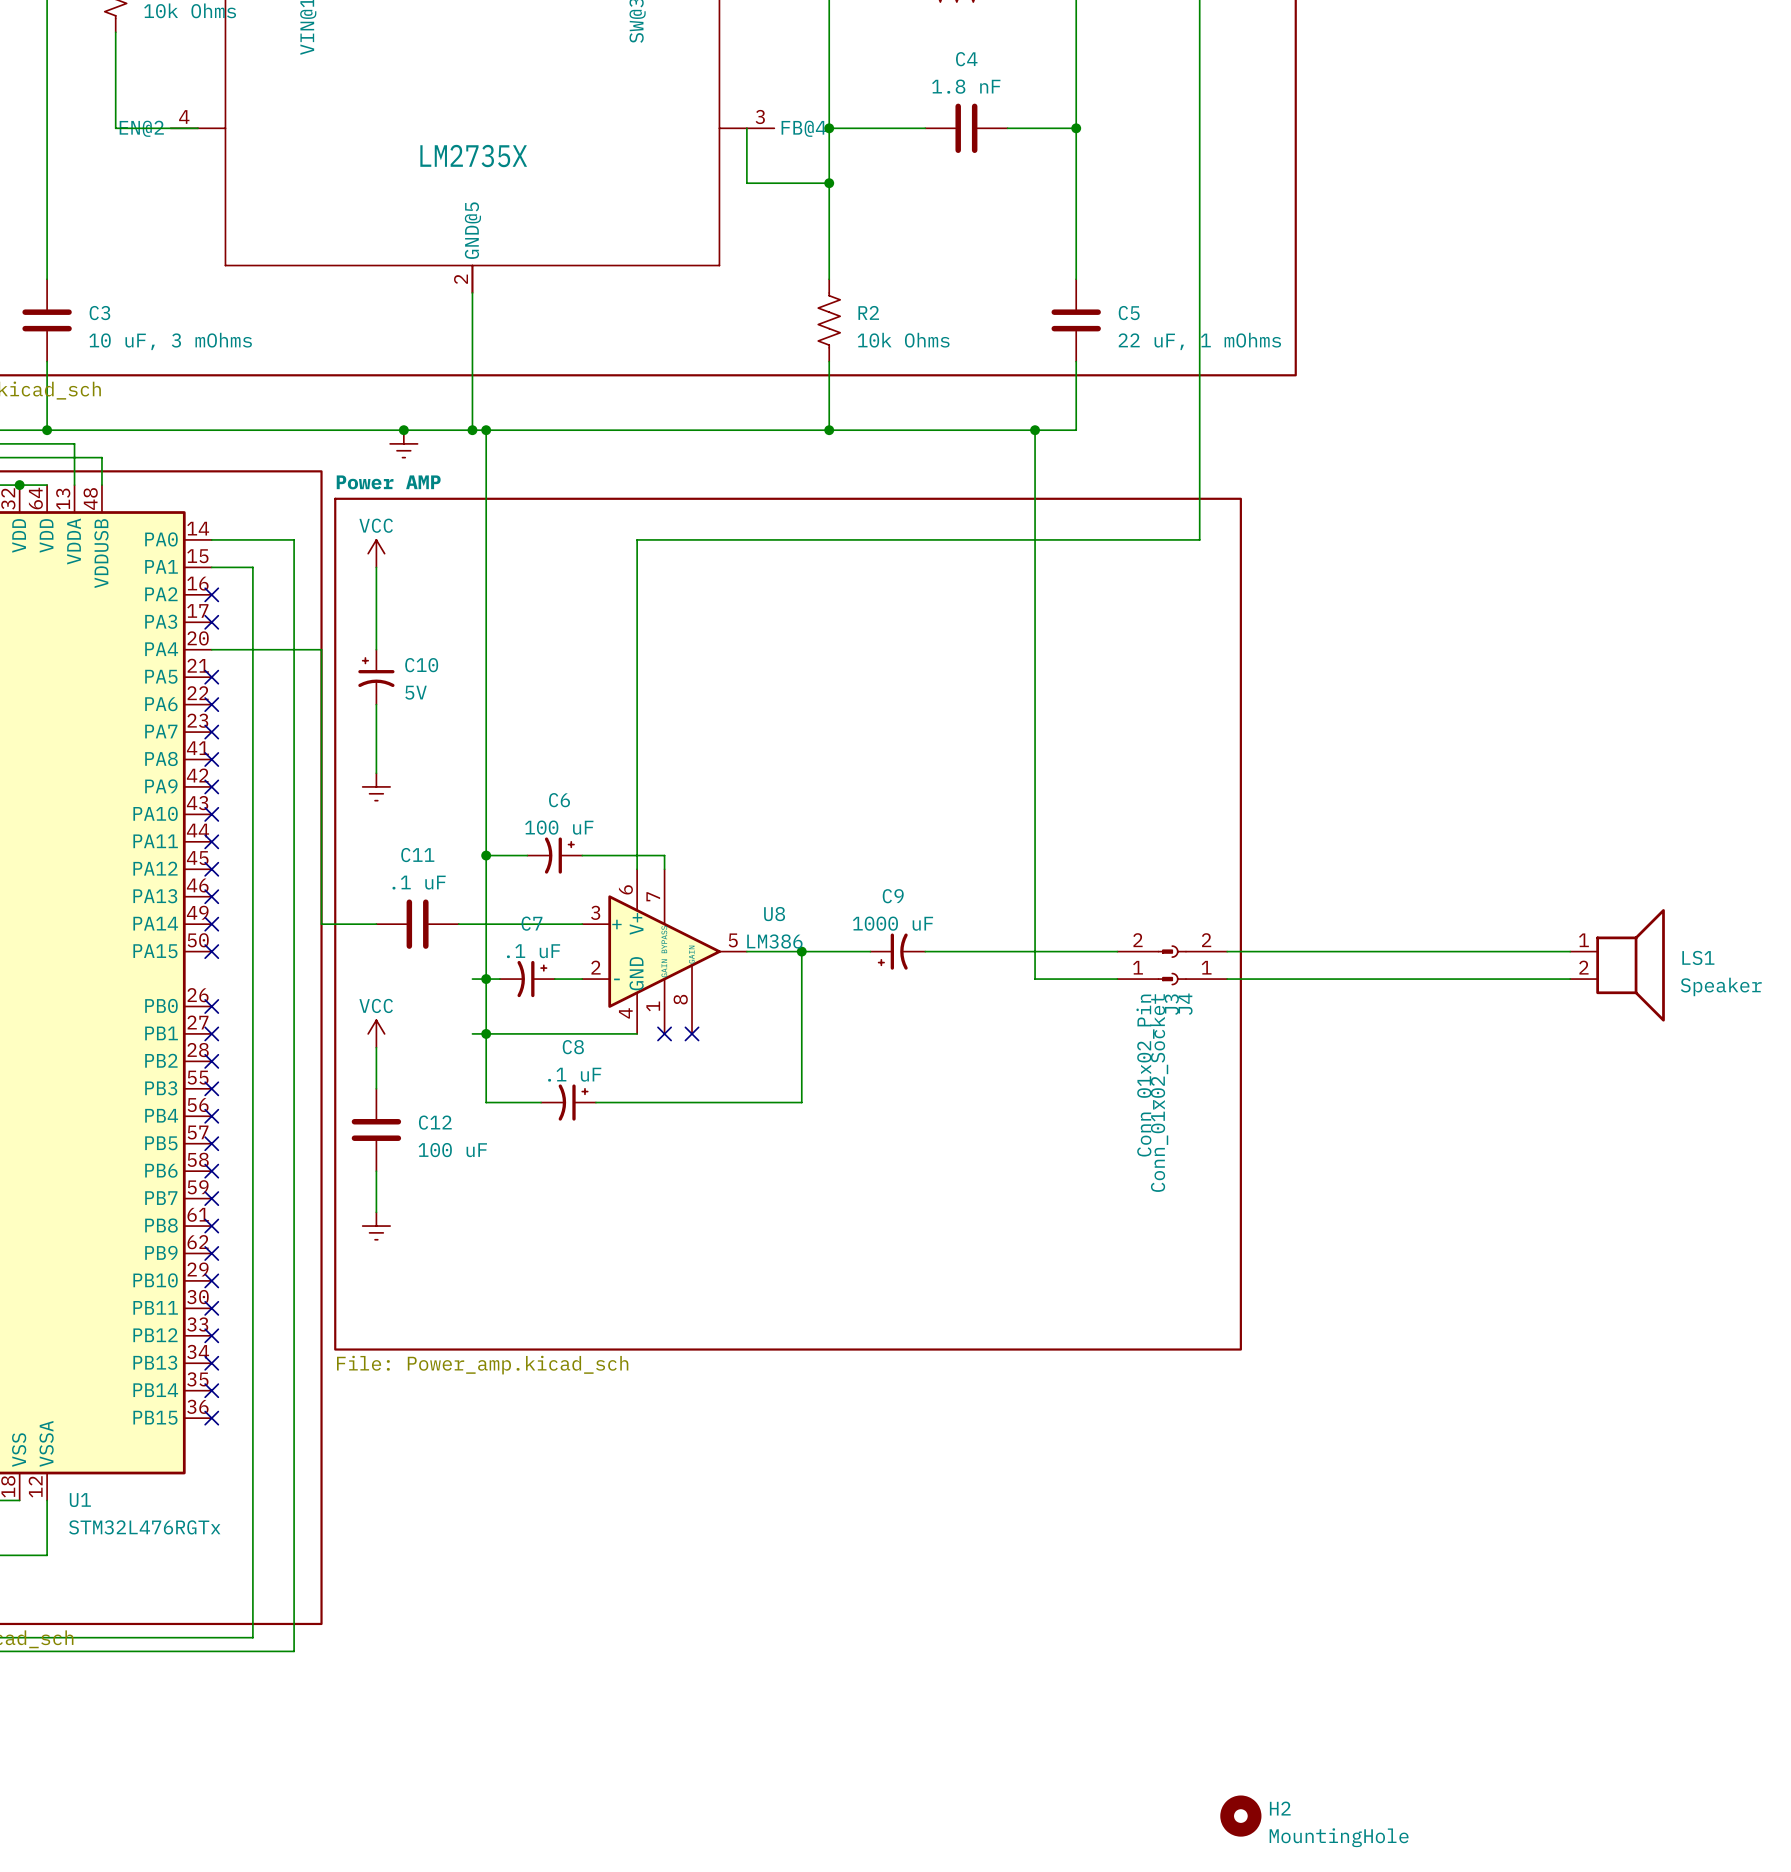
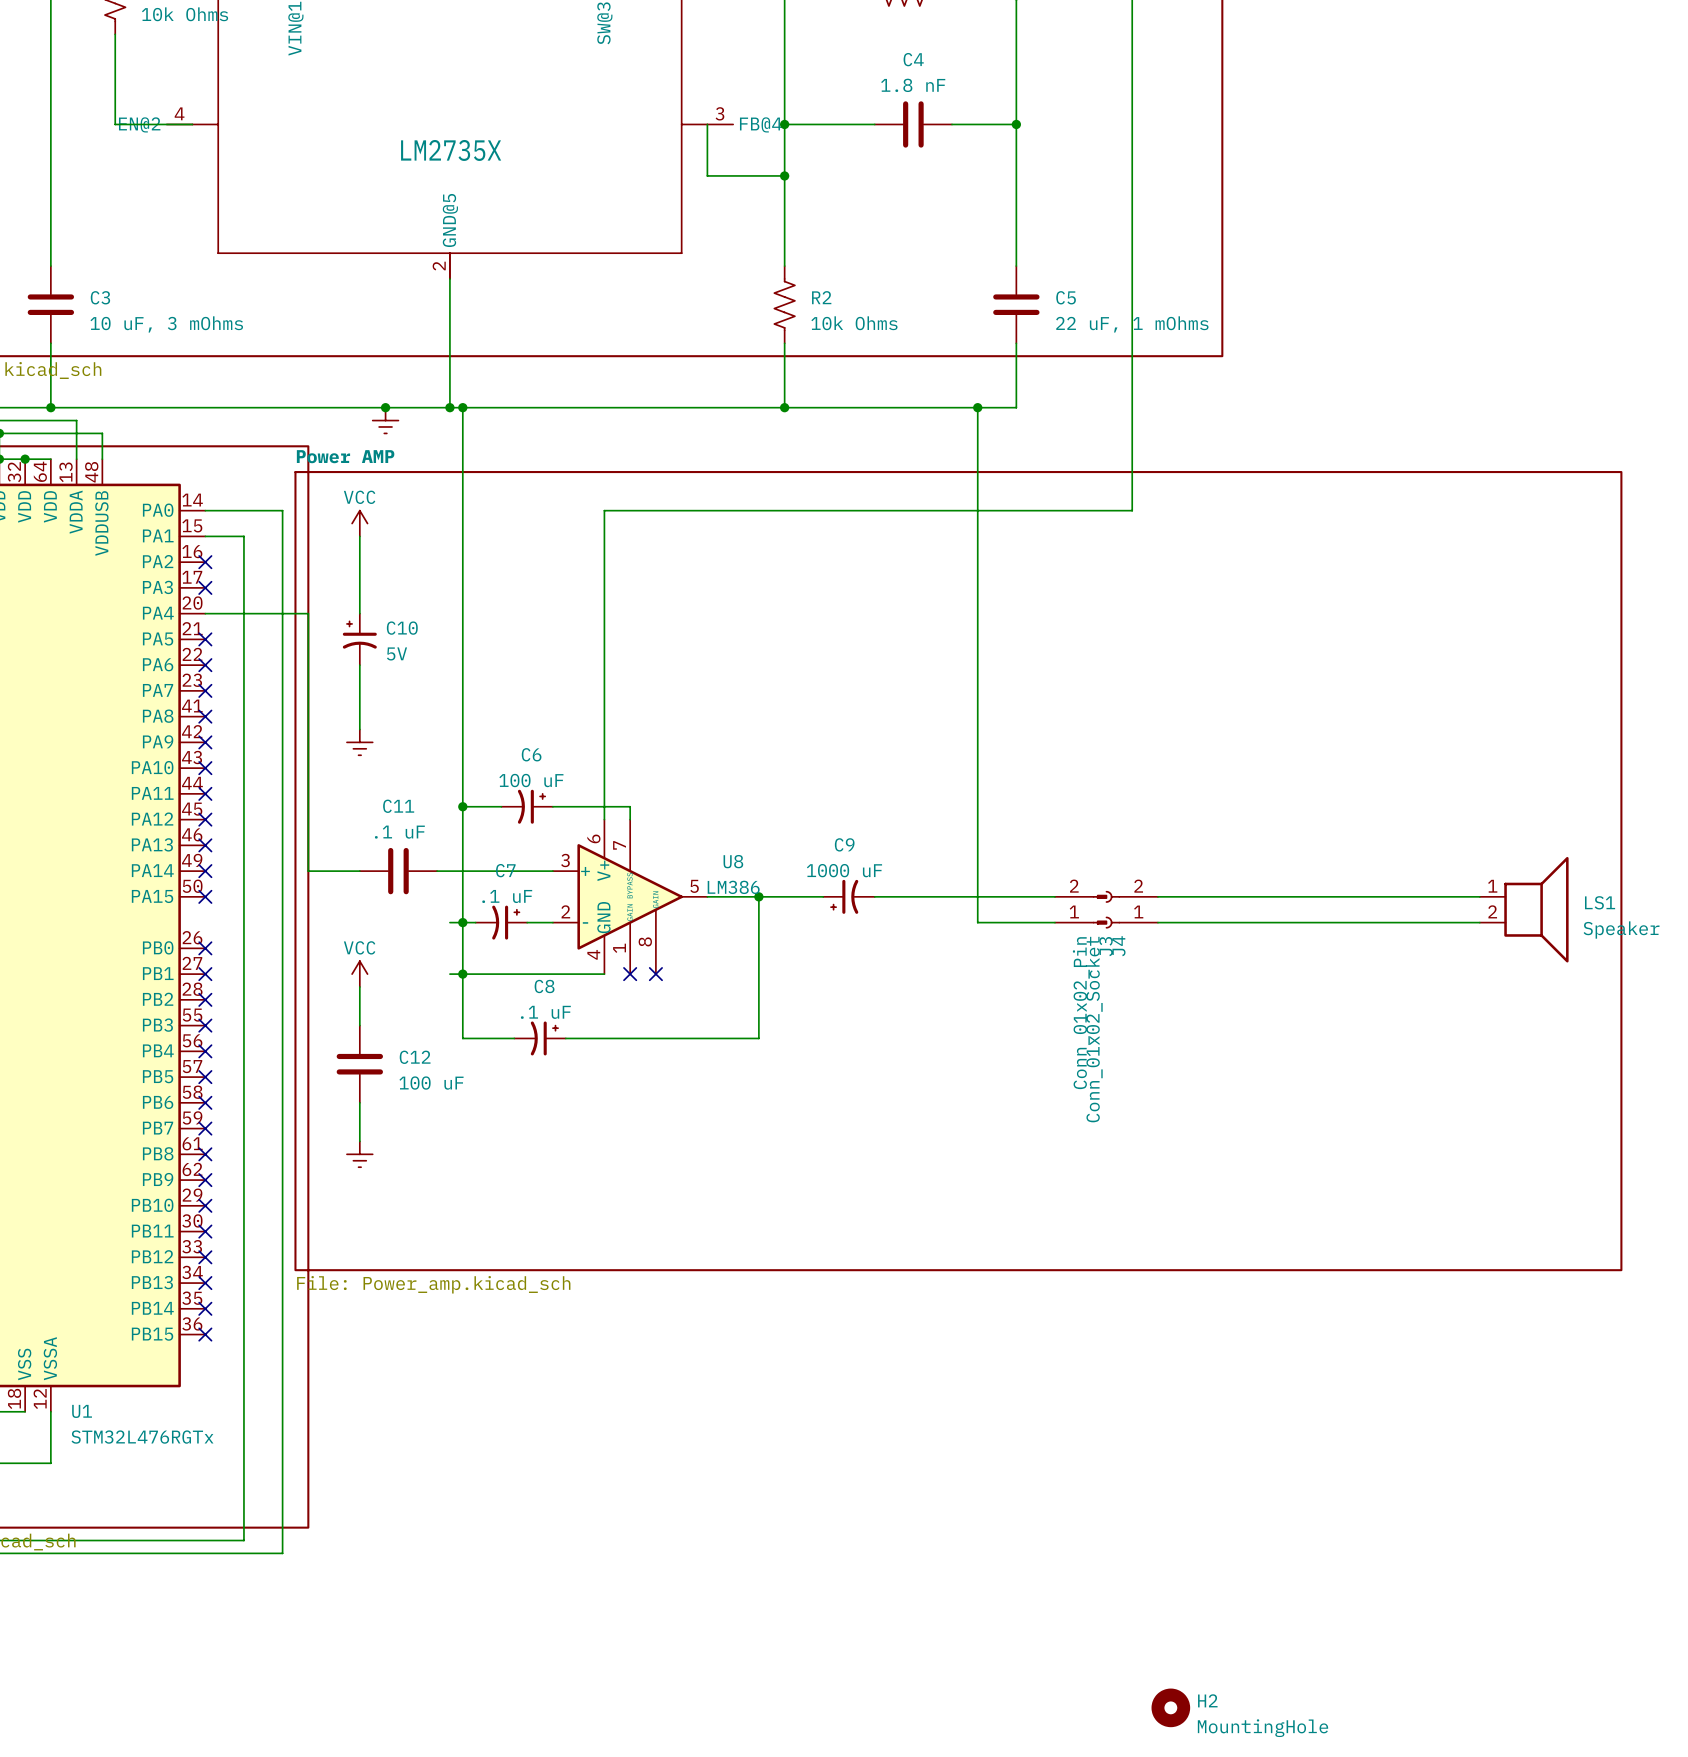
sheet Power AMP: File: Power_amp.kicad_sch (788, 924) -> none
sheet Power AMP: none -> File: Power_amp.kicad_sch (958, 871)

